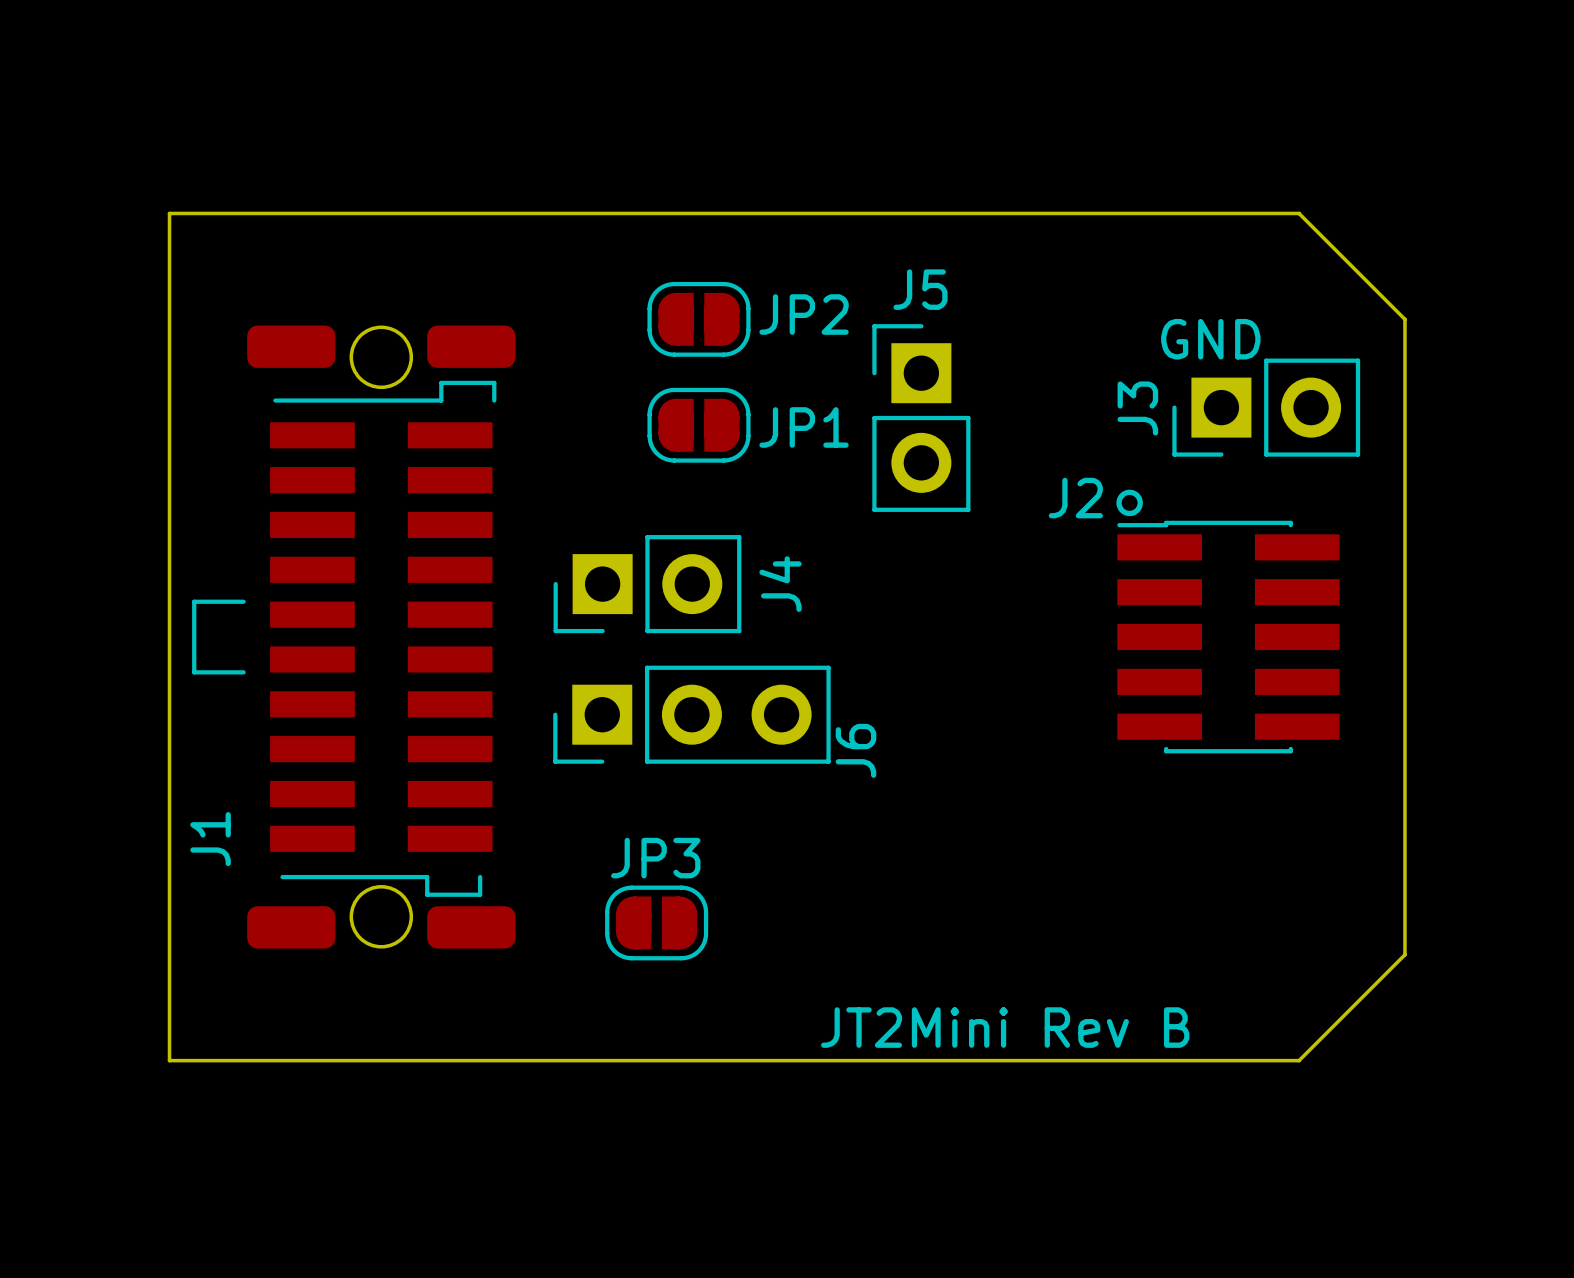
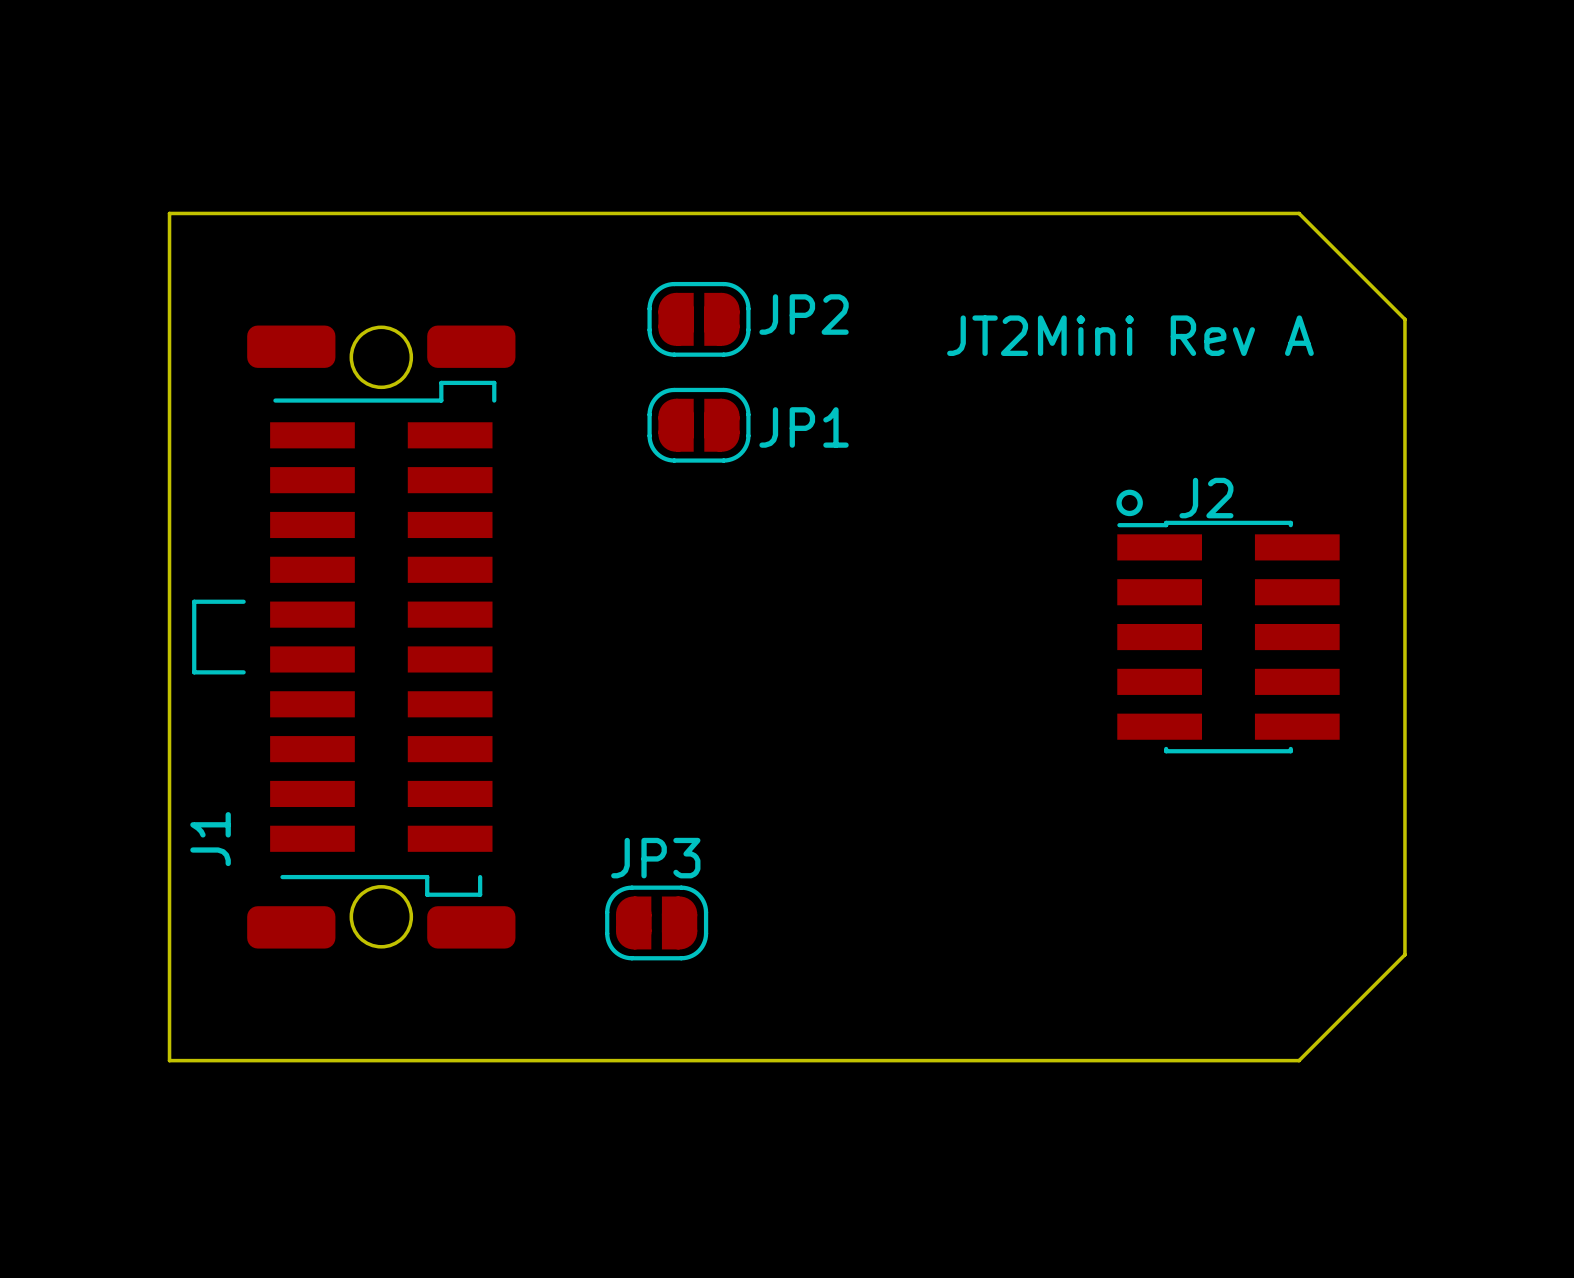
text: none -> JT2Mini Rev A (1130, 335)
text: GND (1210, 339) -> none
J3: (1266, 407) -> none
J5: (921, 418) -> none
J2 name position: J2 (1075, 498) -> J2 (1206, 498)
J4: (647, 584) -> none
J6: (691, 714) -> none
text: JT2Mini Rev B (1005, 1027) -> none

